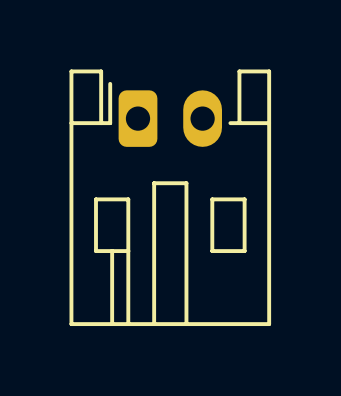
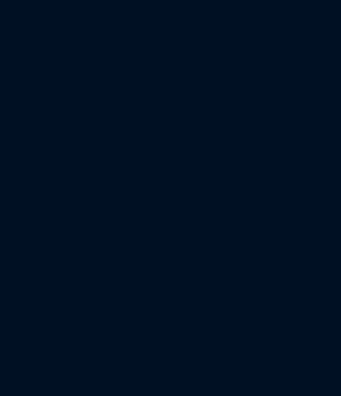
part: (170, 197) -> none

